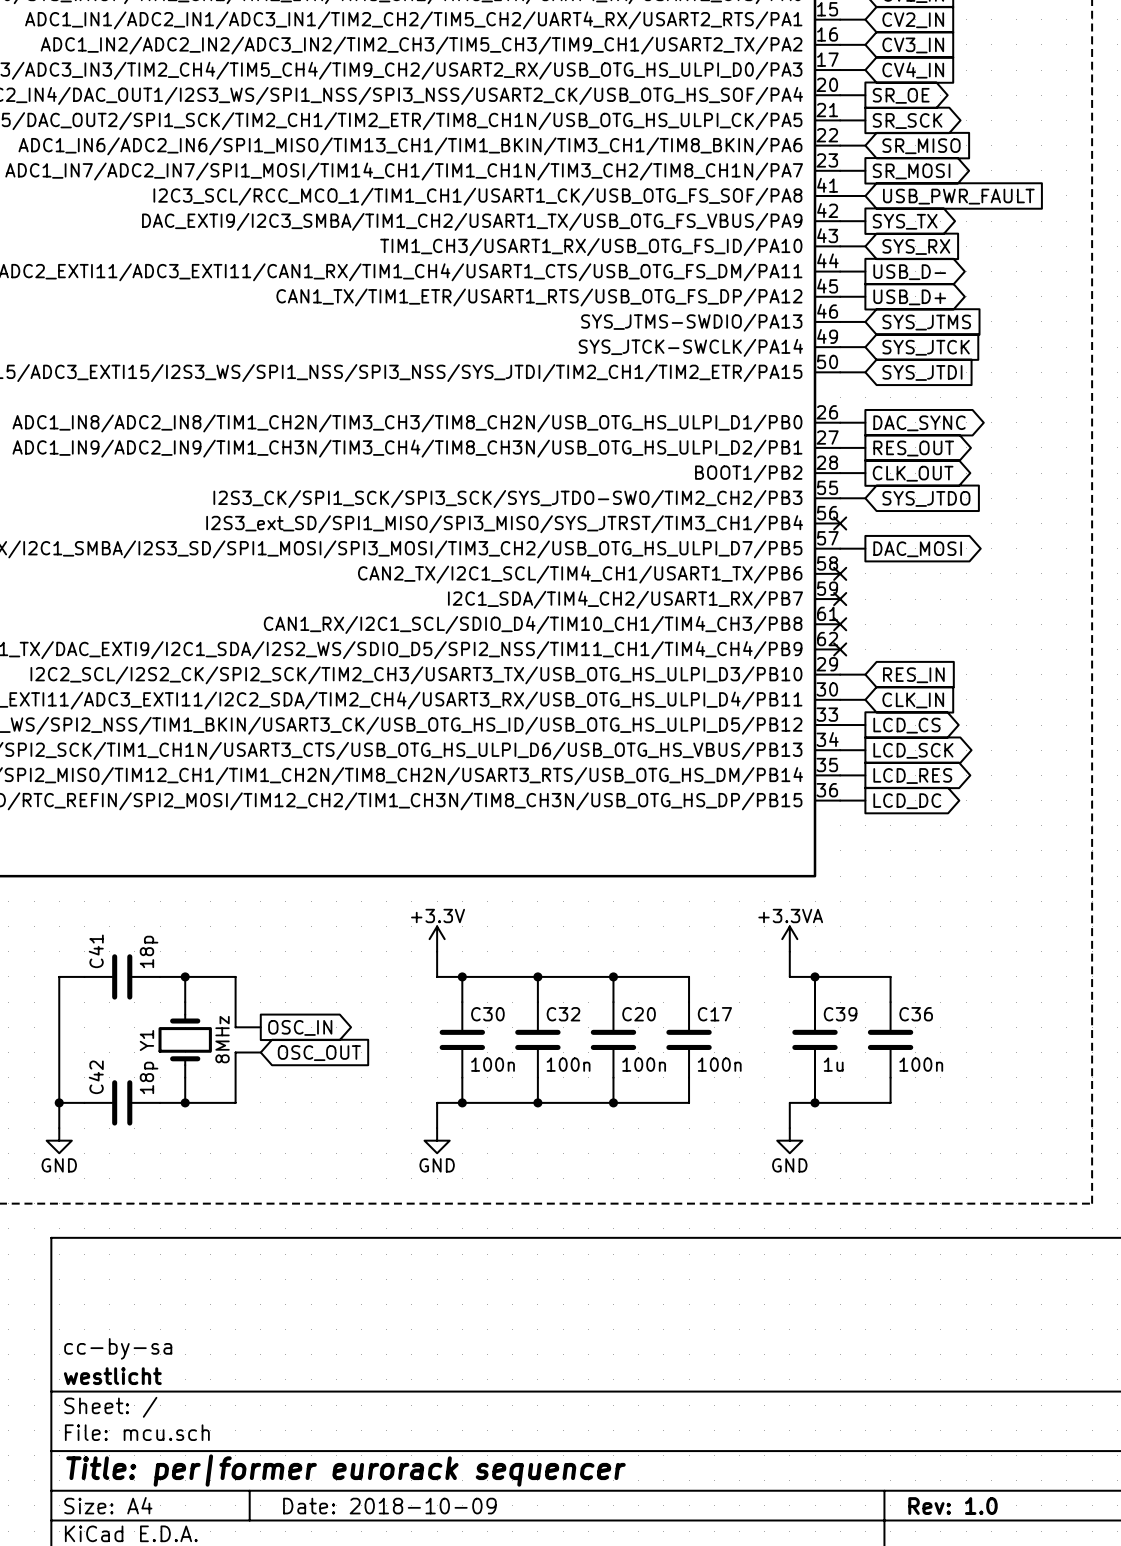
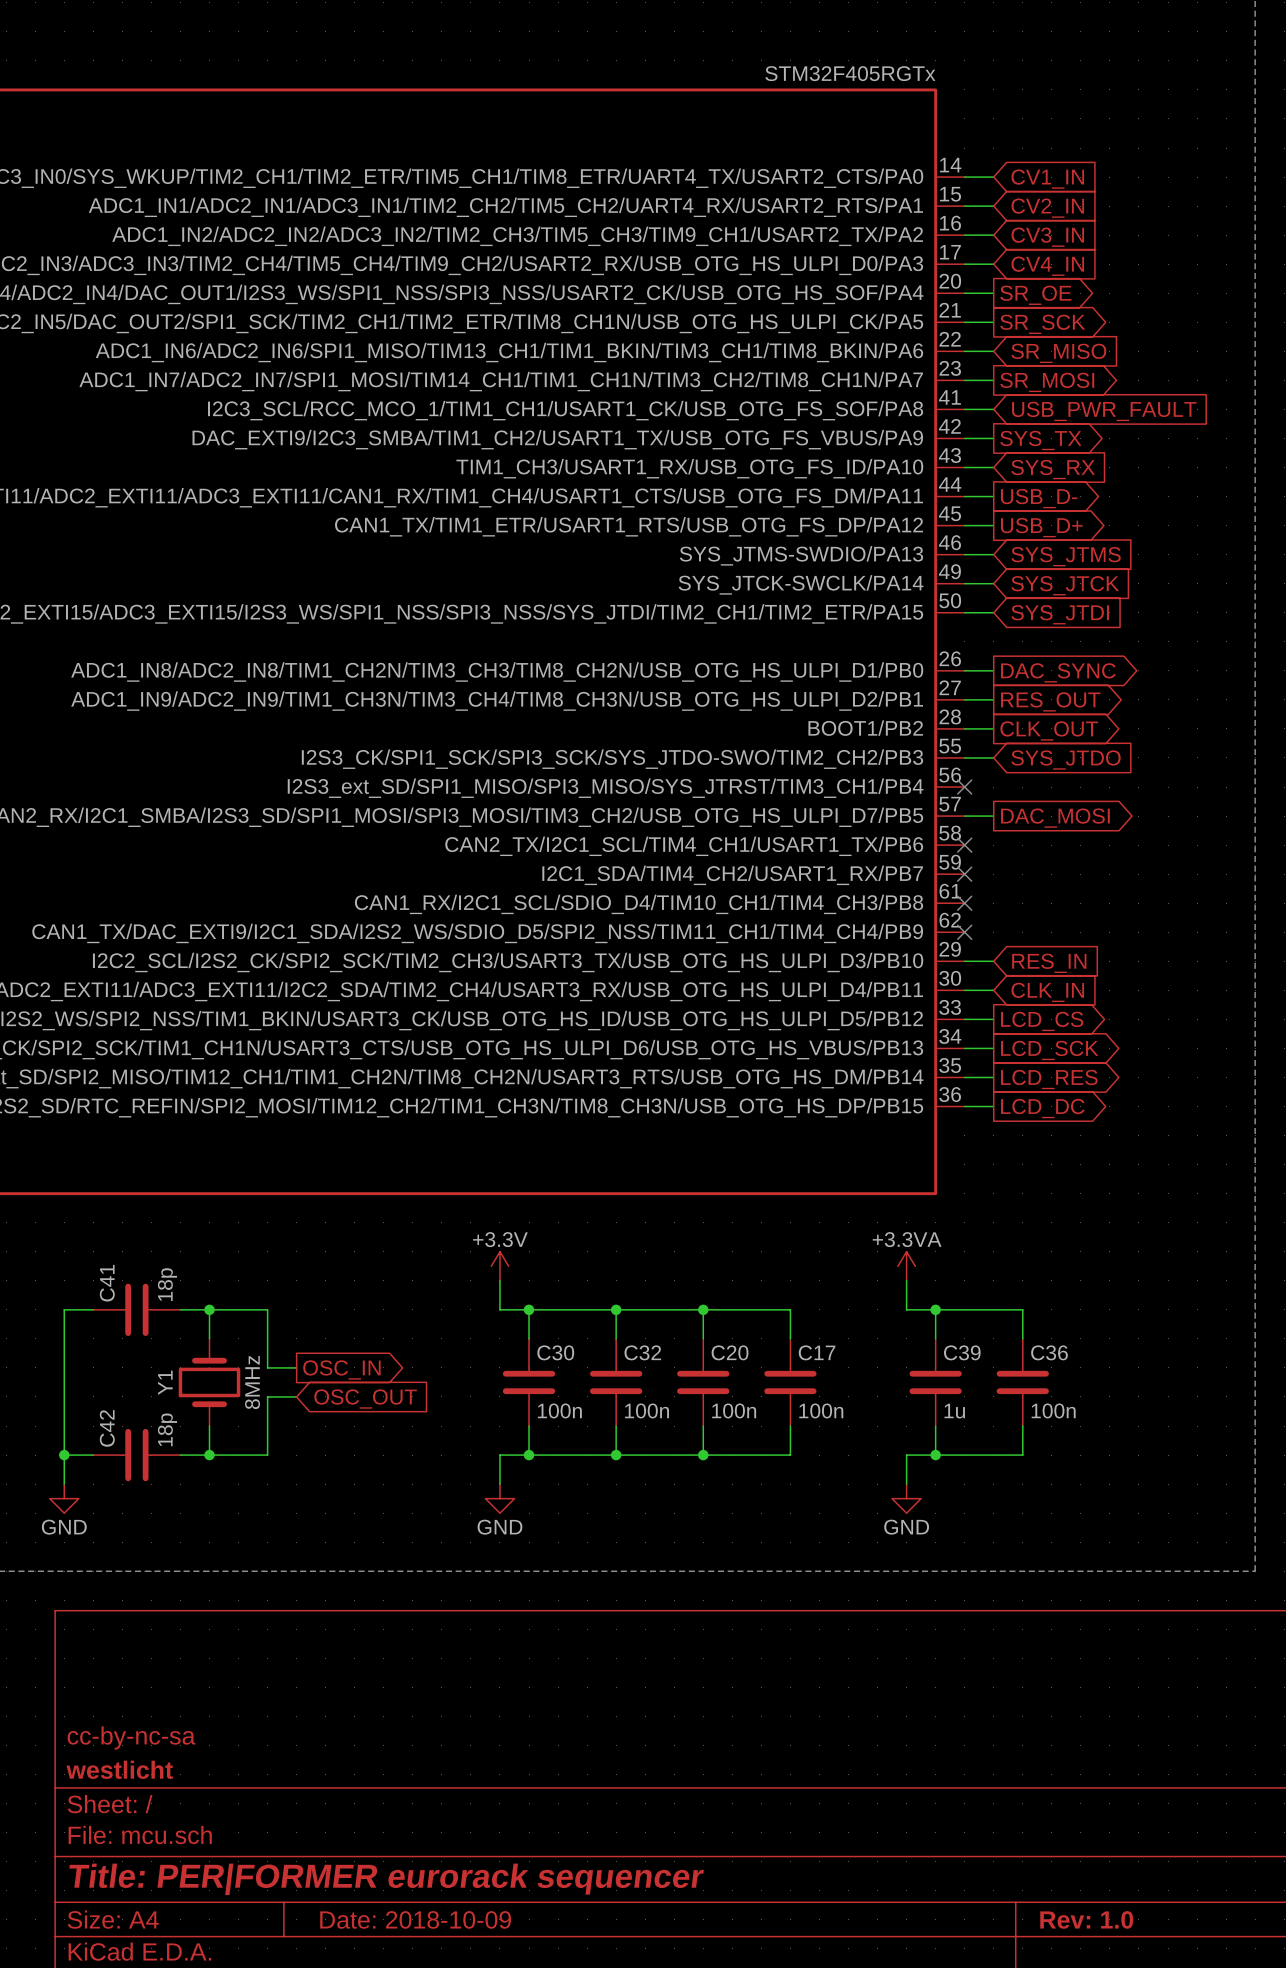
title block: cc-by-sa (118, 1348) -> cc-by-nc-sa (131, 1737)
title block: Title: per|former eurorack sequencer (346, 1470) -> Title: PER|FORMER eurorack sequencer (386, 1879)

